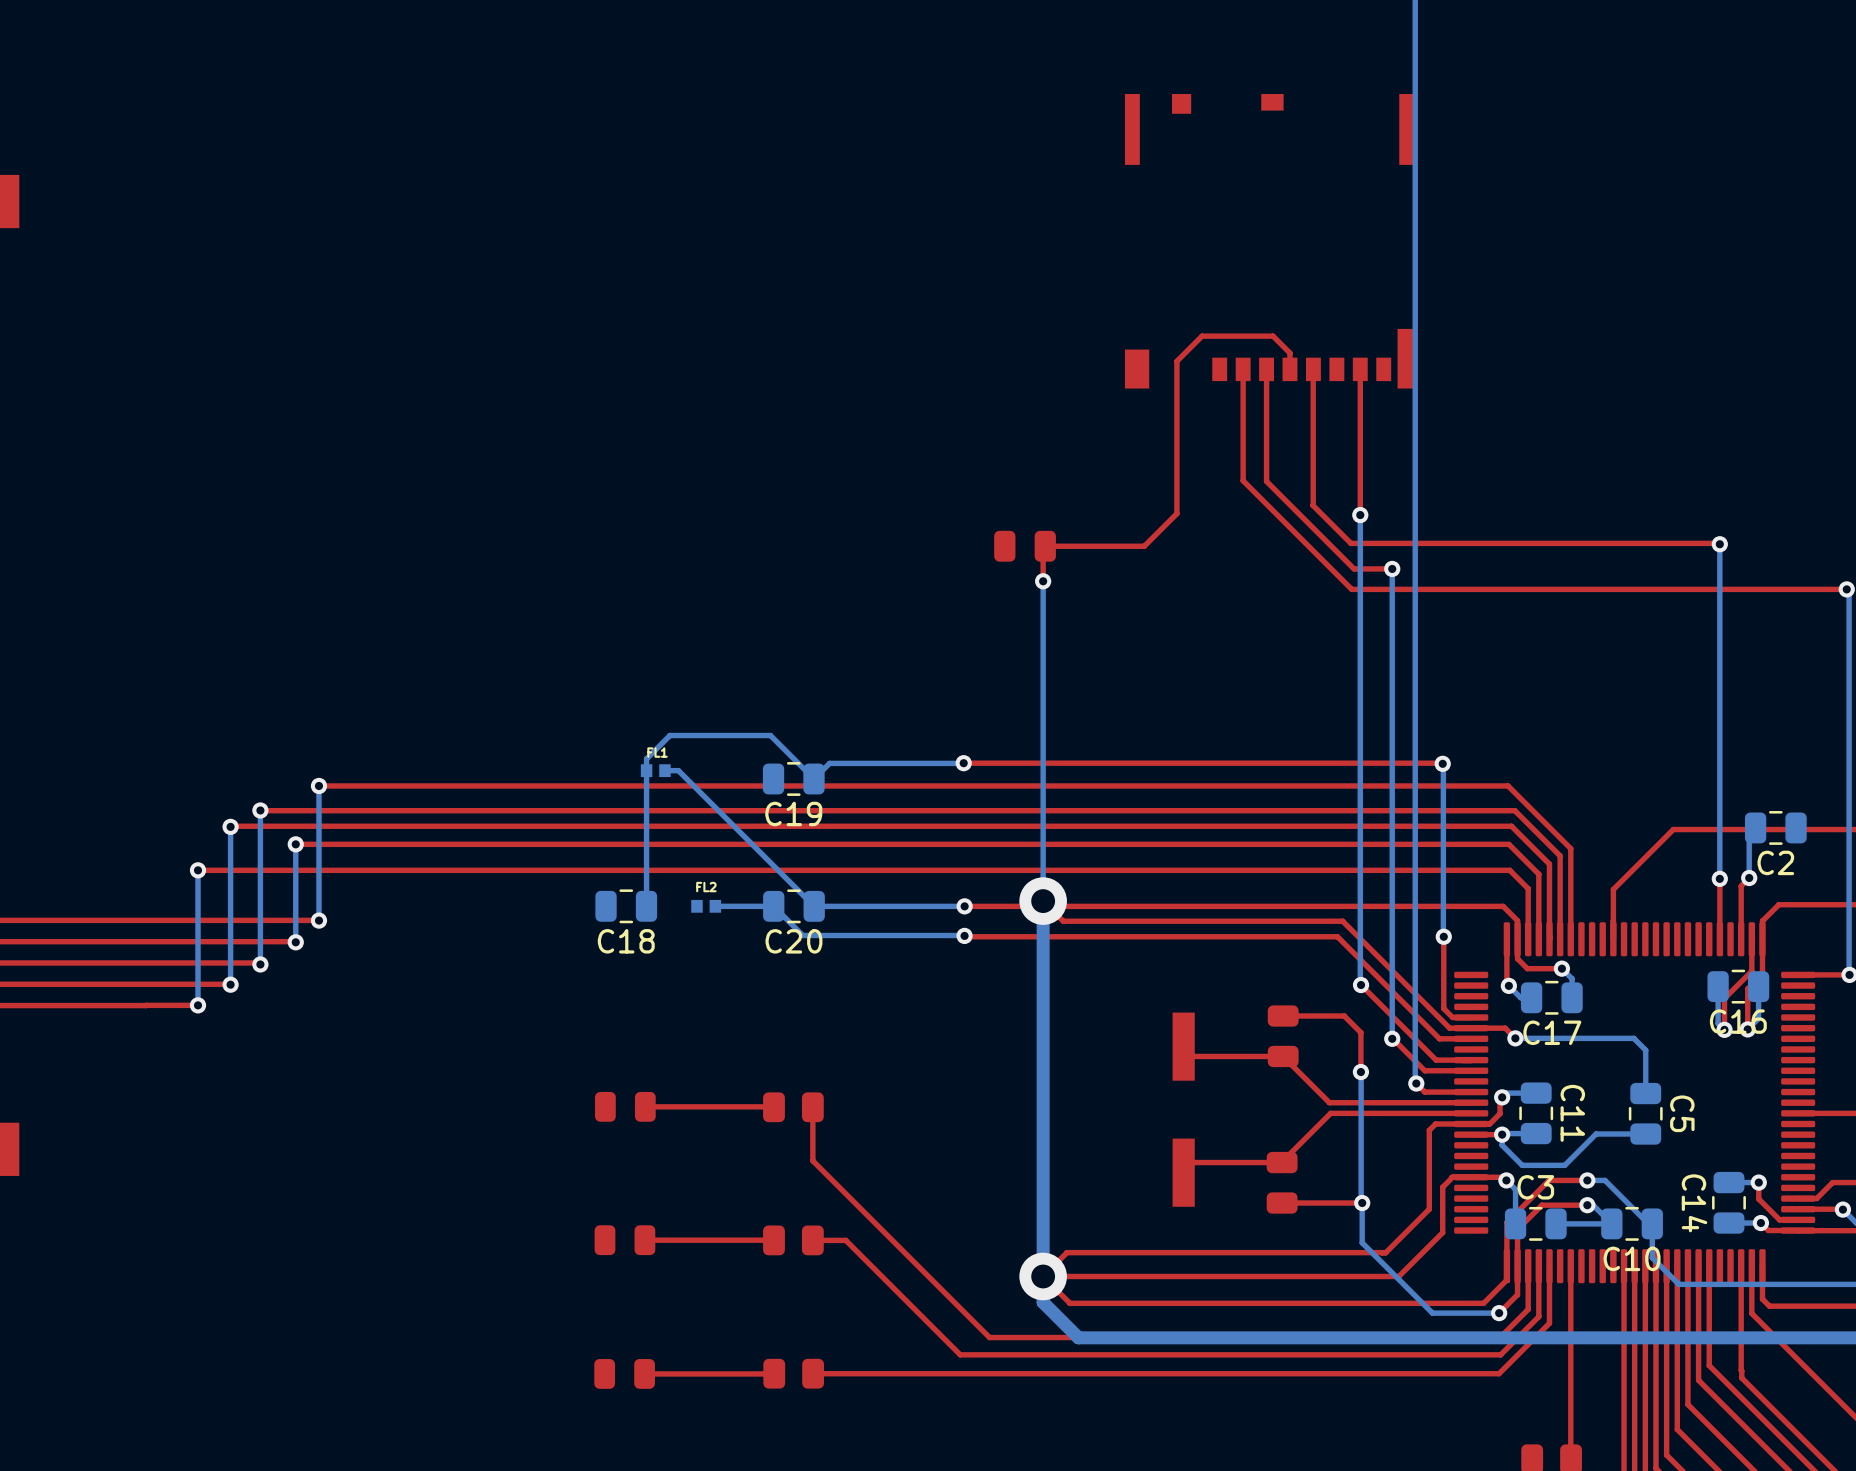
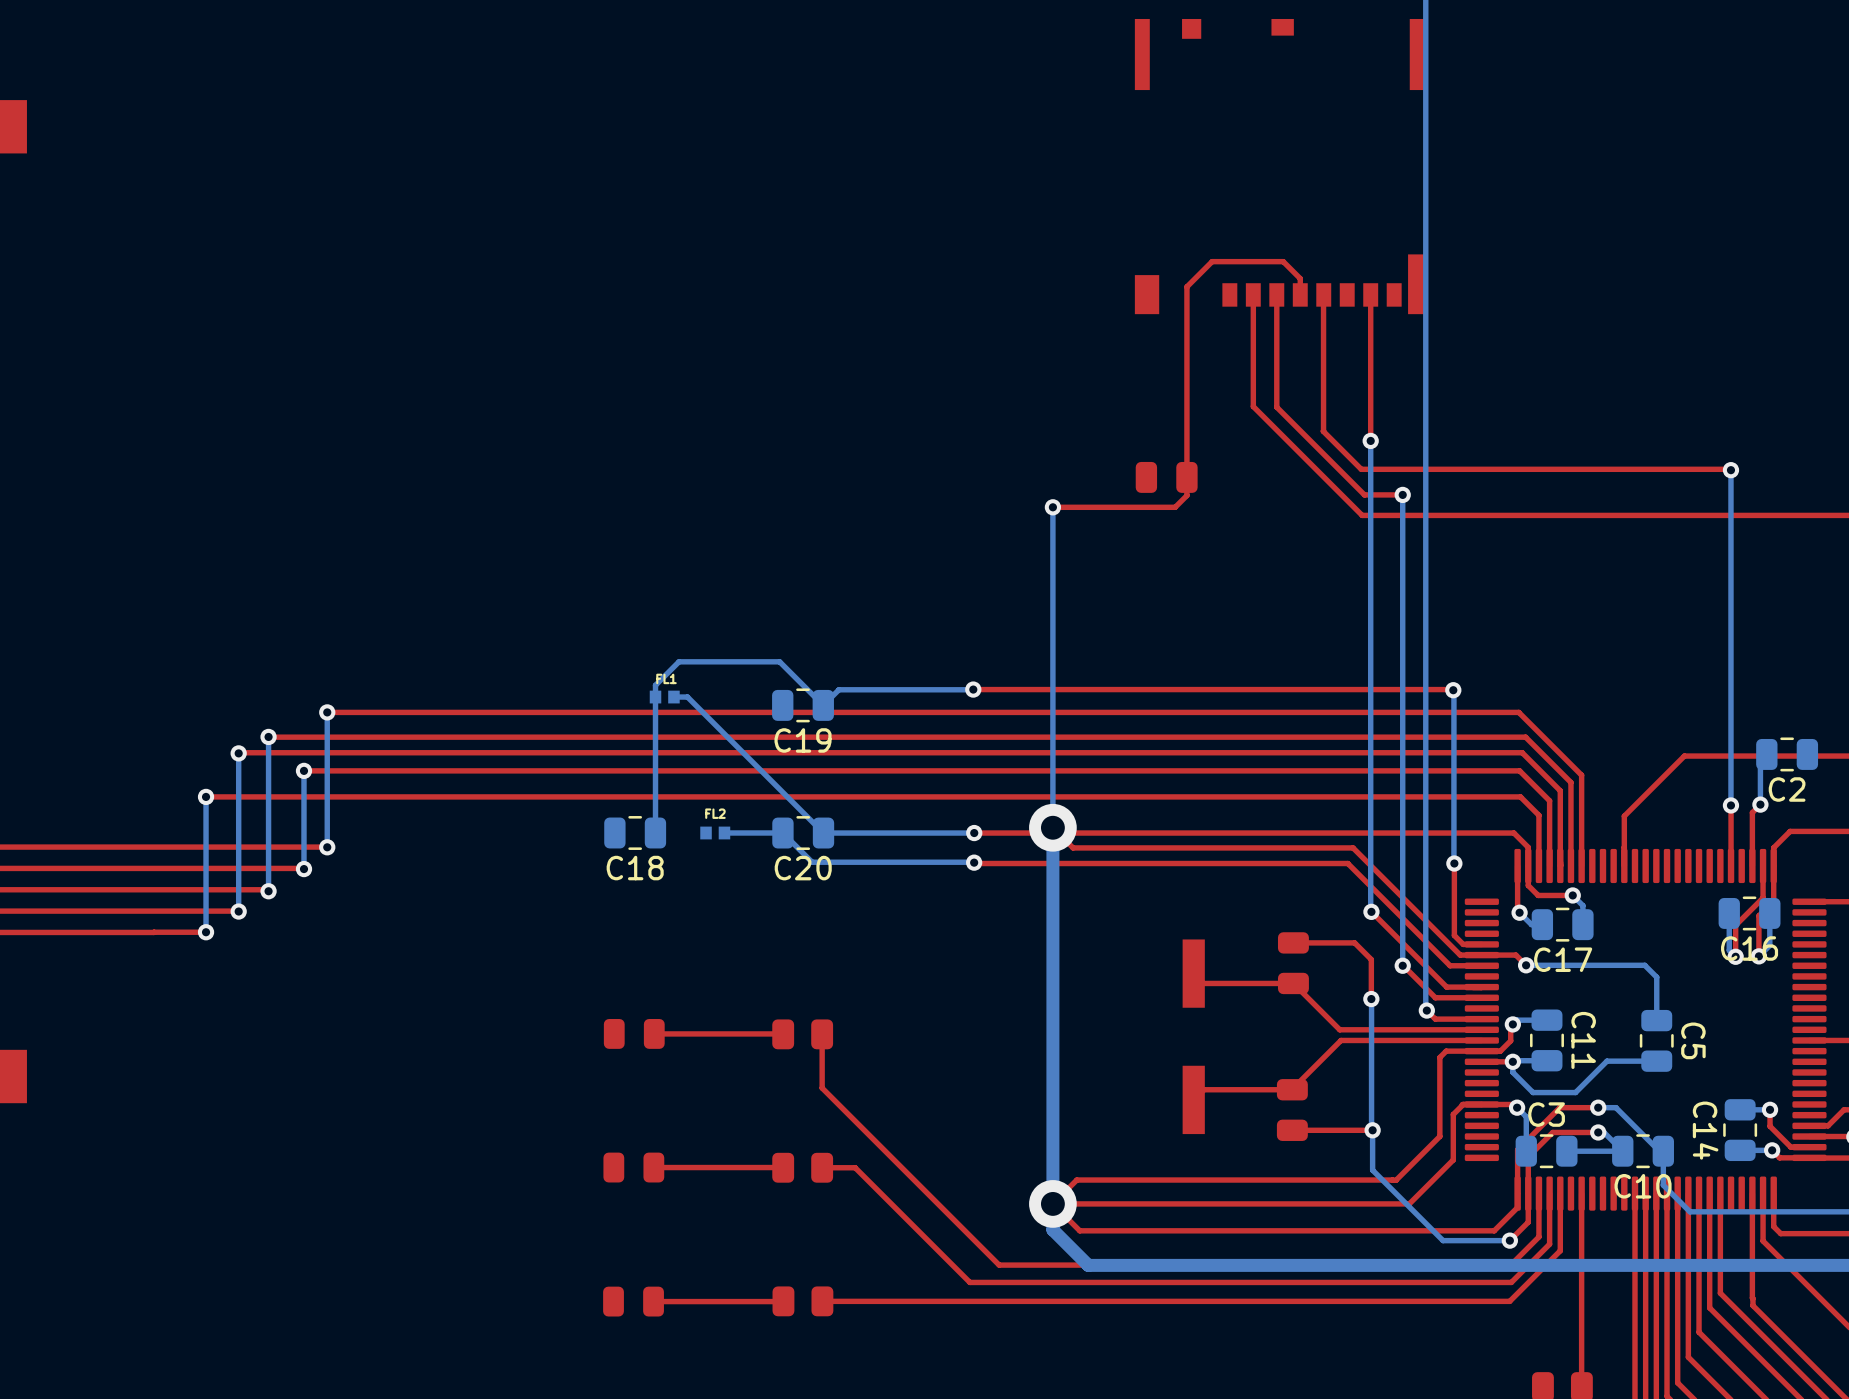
top track: (1176, 513) (1144, 546) (1045, 546) (1043, 548) (1043, 581) -> (1186, 439) (1186, 495) (1175, 507) (1052, 507)
part position: (1025, 546) -> (1166, 477)

